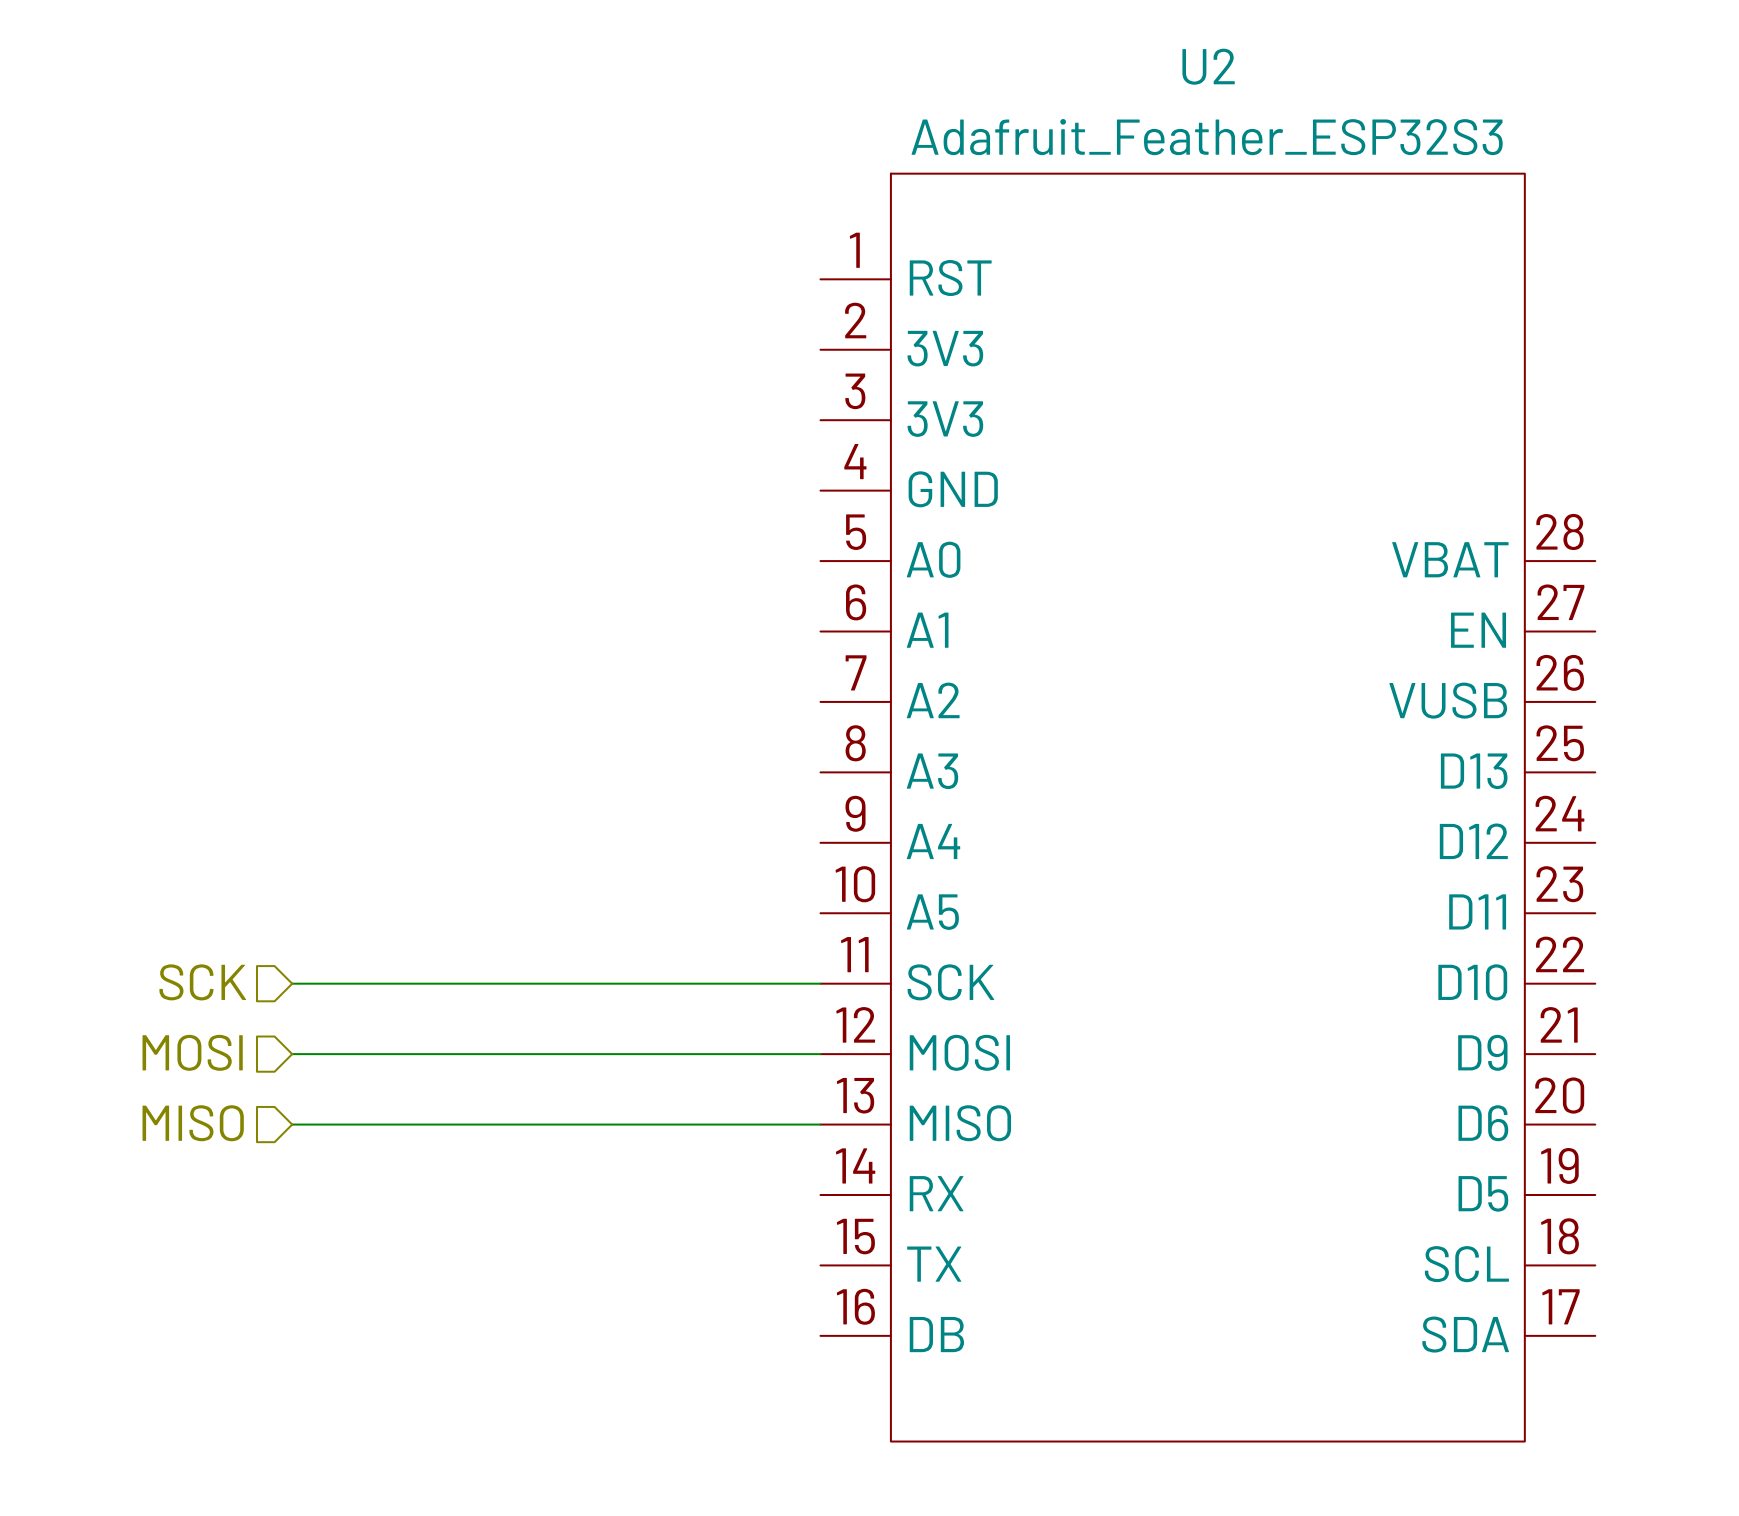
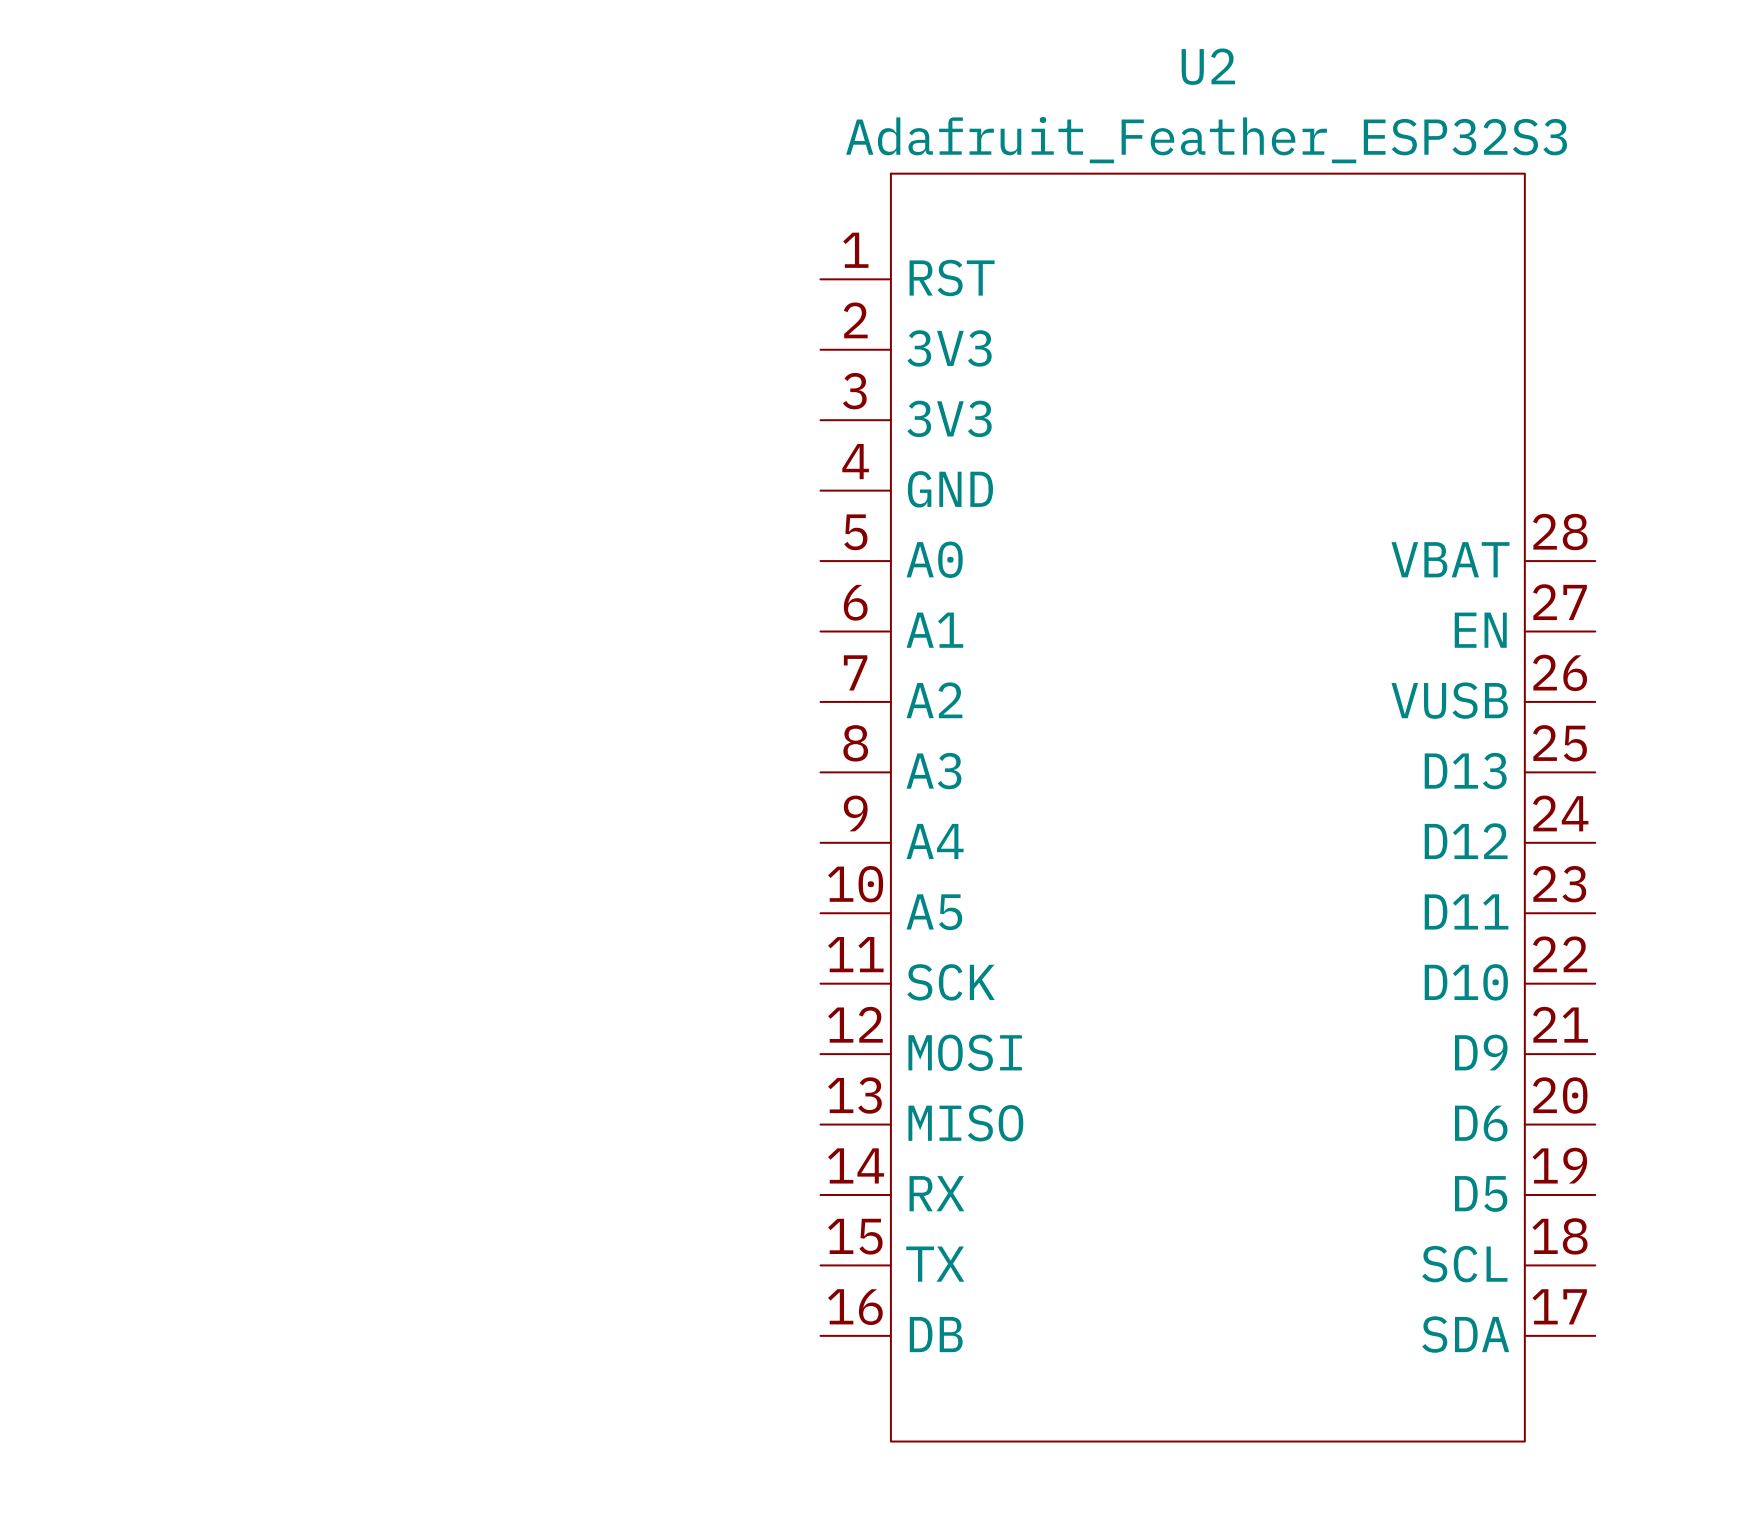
hierarchical label: SCK (202, 982) -> none
wire: (292, 983) (820, 983) -> none
hierarchical label: MOSI (192, 1052) -> none
wire: (292, 1054) (820, 1054) -> none
hierarchical label: MISO (193, 1123) -> none
wire: (292, 1124) (820, 1124) -> none

